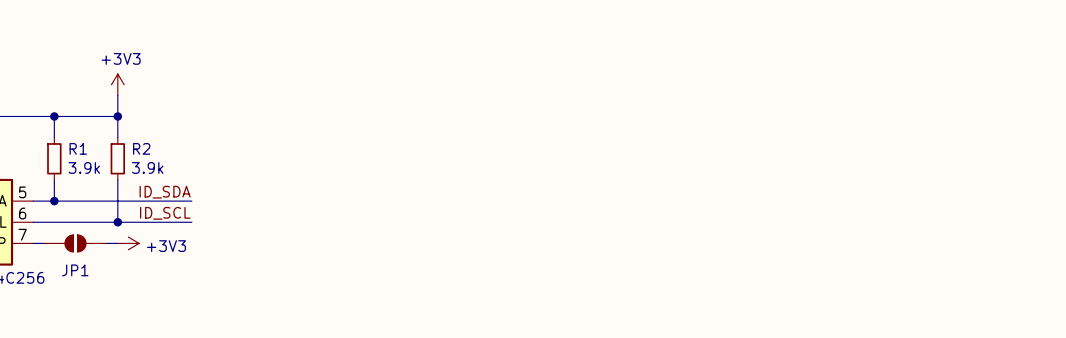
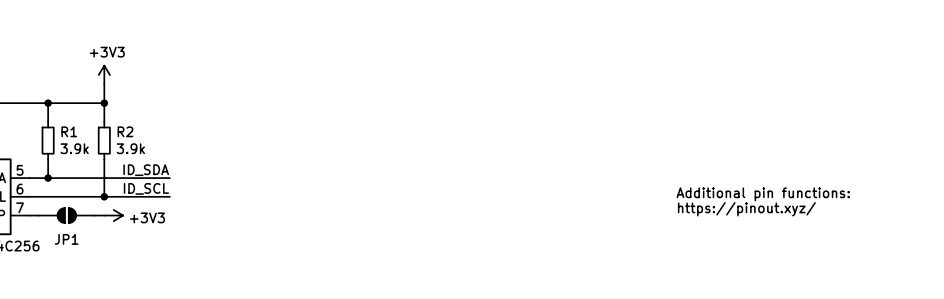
text: none -> Additional pin functions: (763, 194)
text: none -> https://pinout.xyz/ (746, 209)

